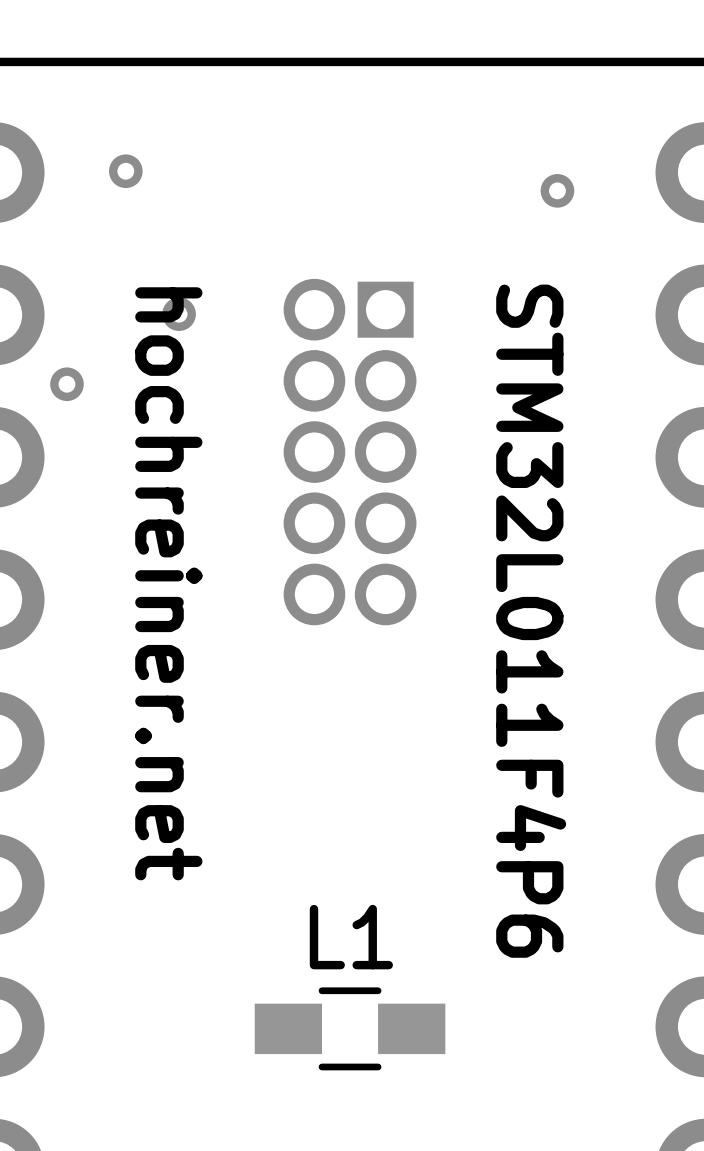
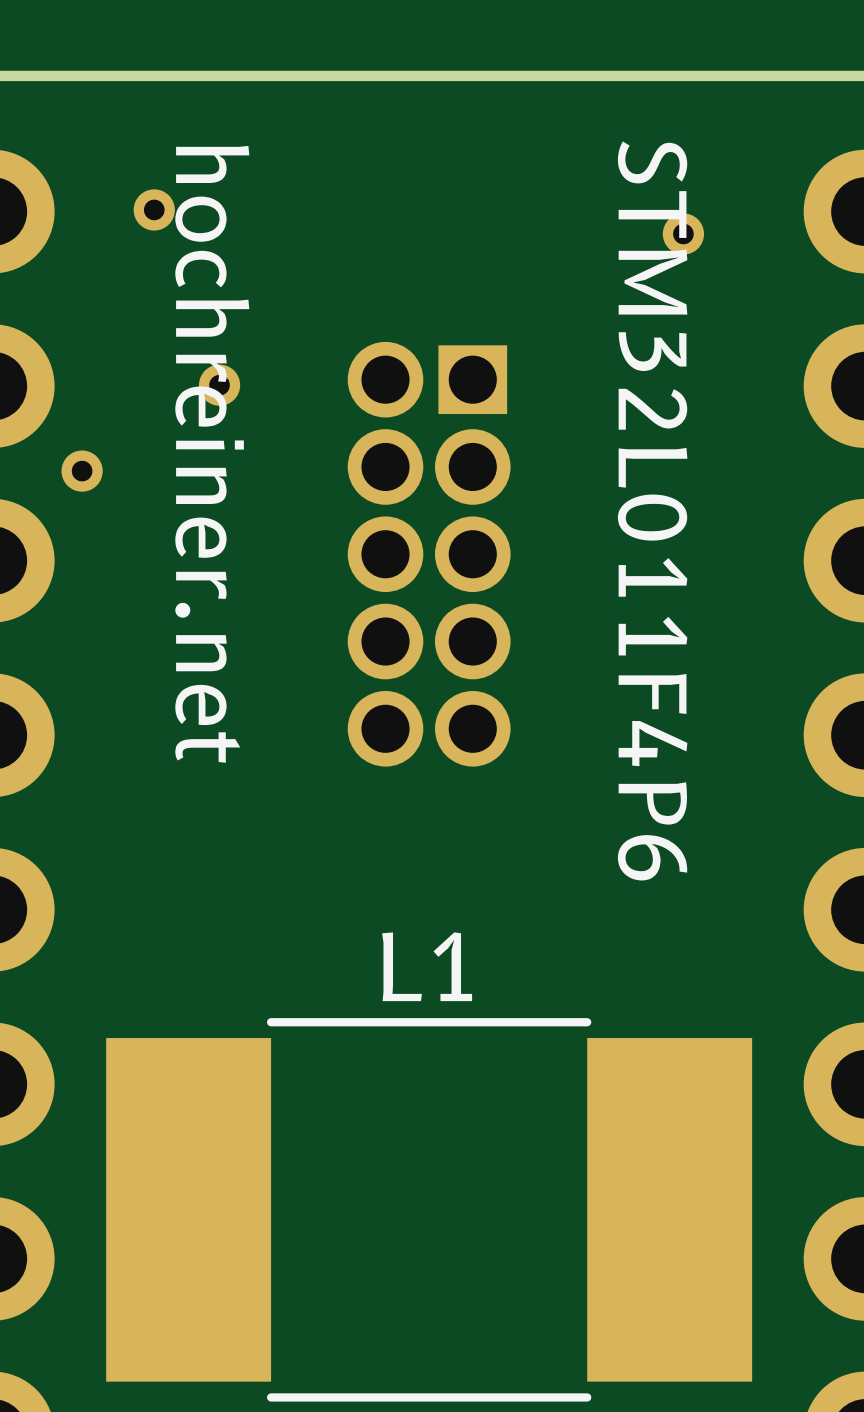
text position: hochreiner.net (168, 583) -> hochreiner.net (212, 454)
text position: STM32L011F4P6 (531, 621) -> STM32L011F4P6 (652, 510)
L1 footprint: [254, 987, 446, 1071] -> [106, 1018, 753, 1402]

